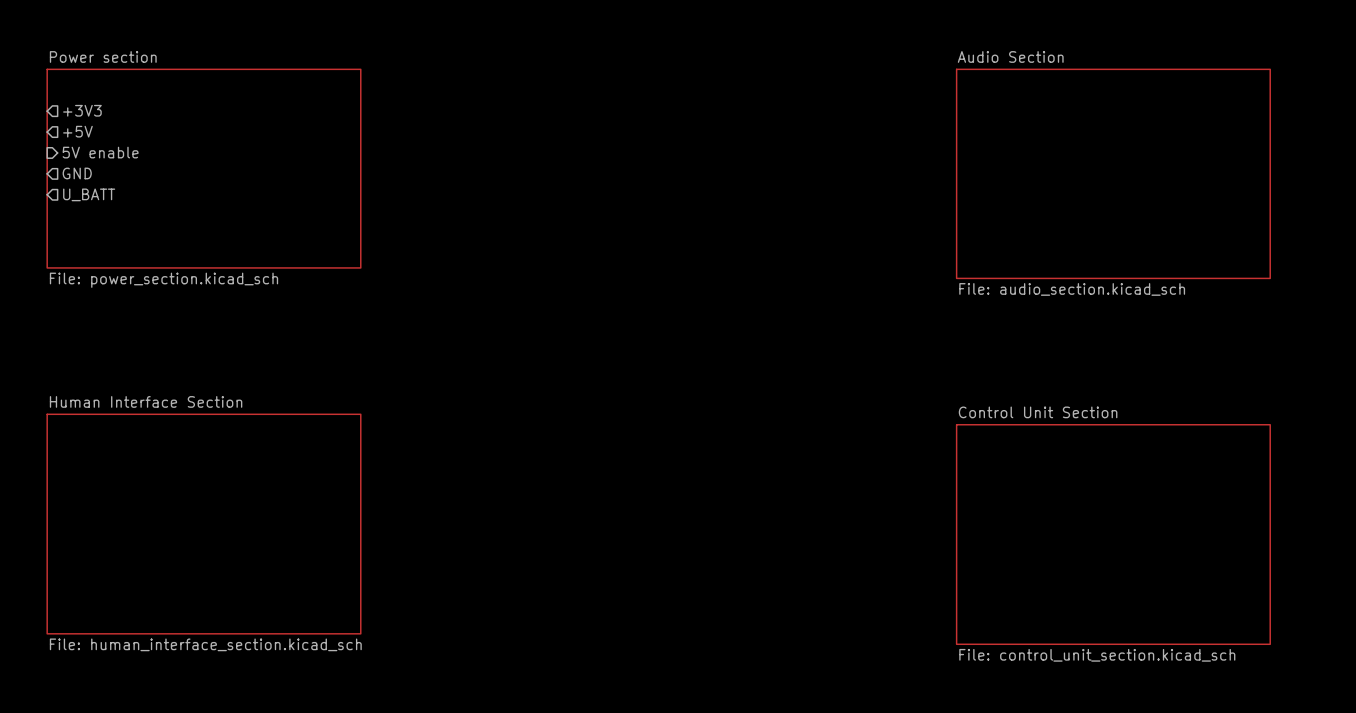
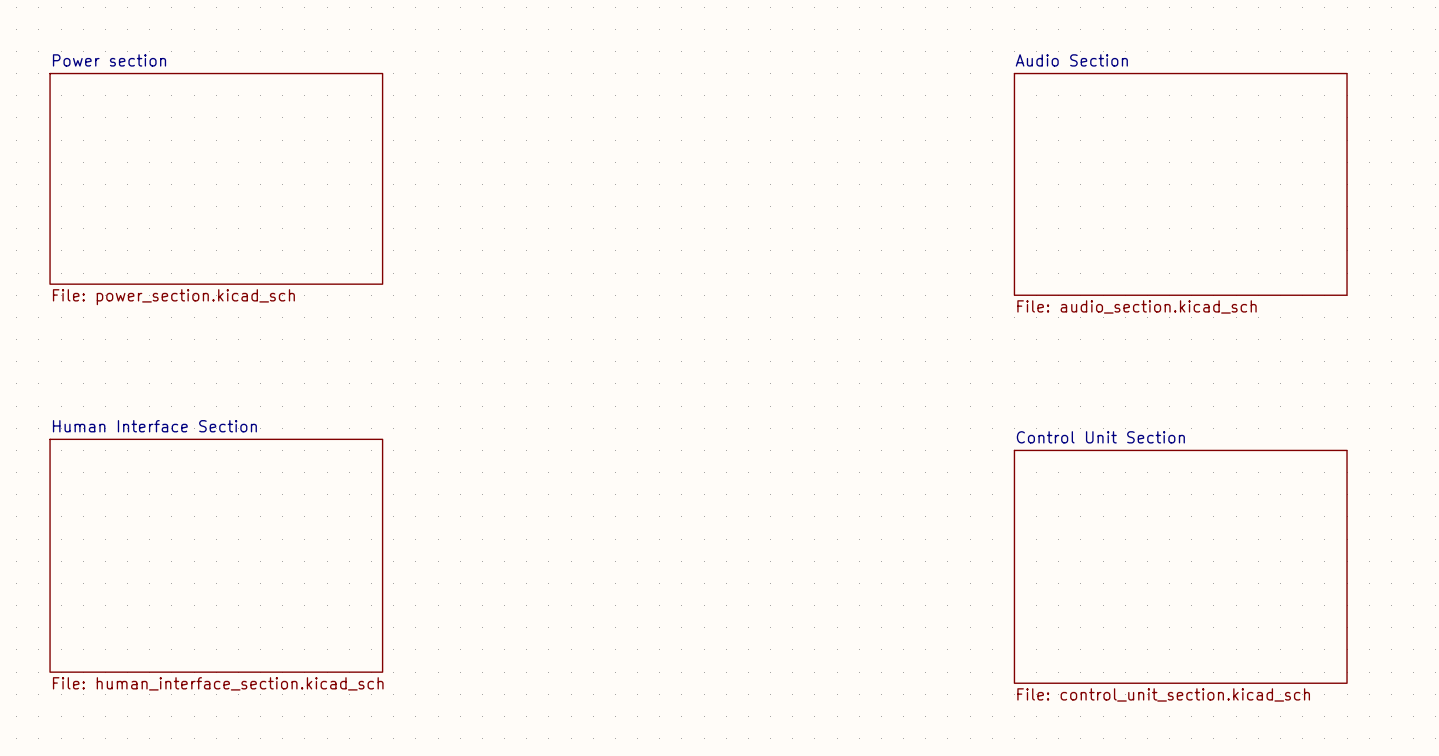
sheet pin: +3V3 (82, 110) -> none
sheet pin: +5V (77, 131) -> none
sheet pin: 5V enable (100, 152) -> none
sheet pin: GND (77, 173) -> none
sheet pin: U_BATT (89, 194) -> none

